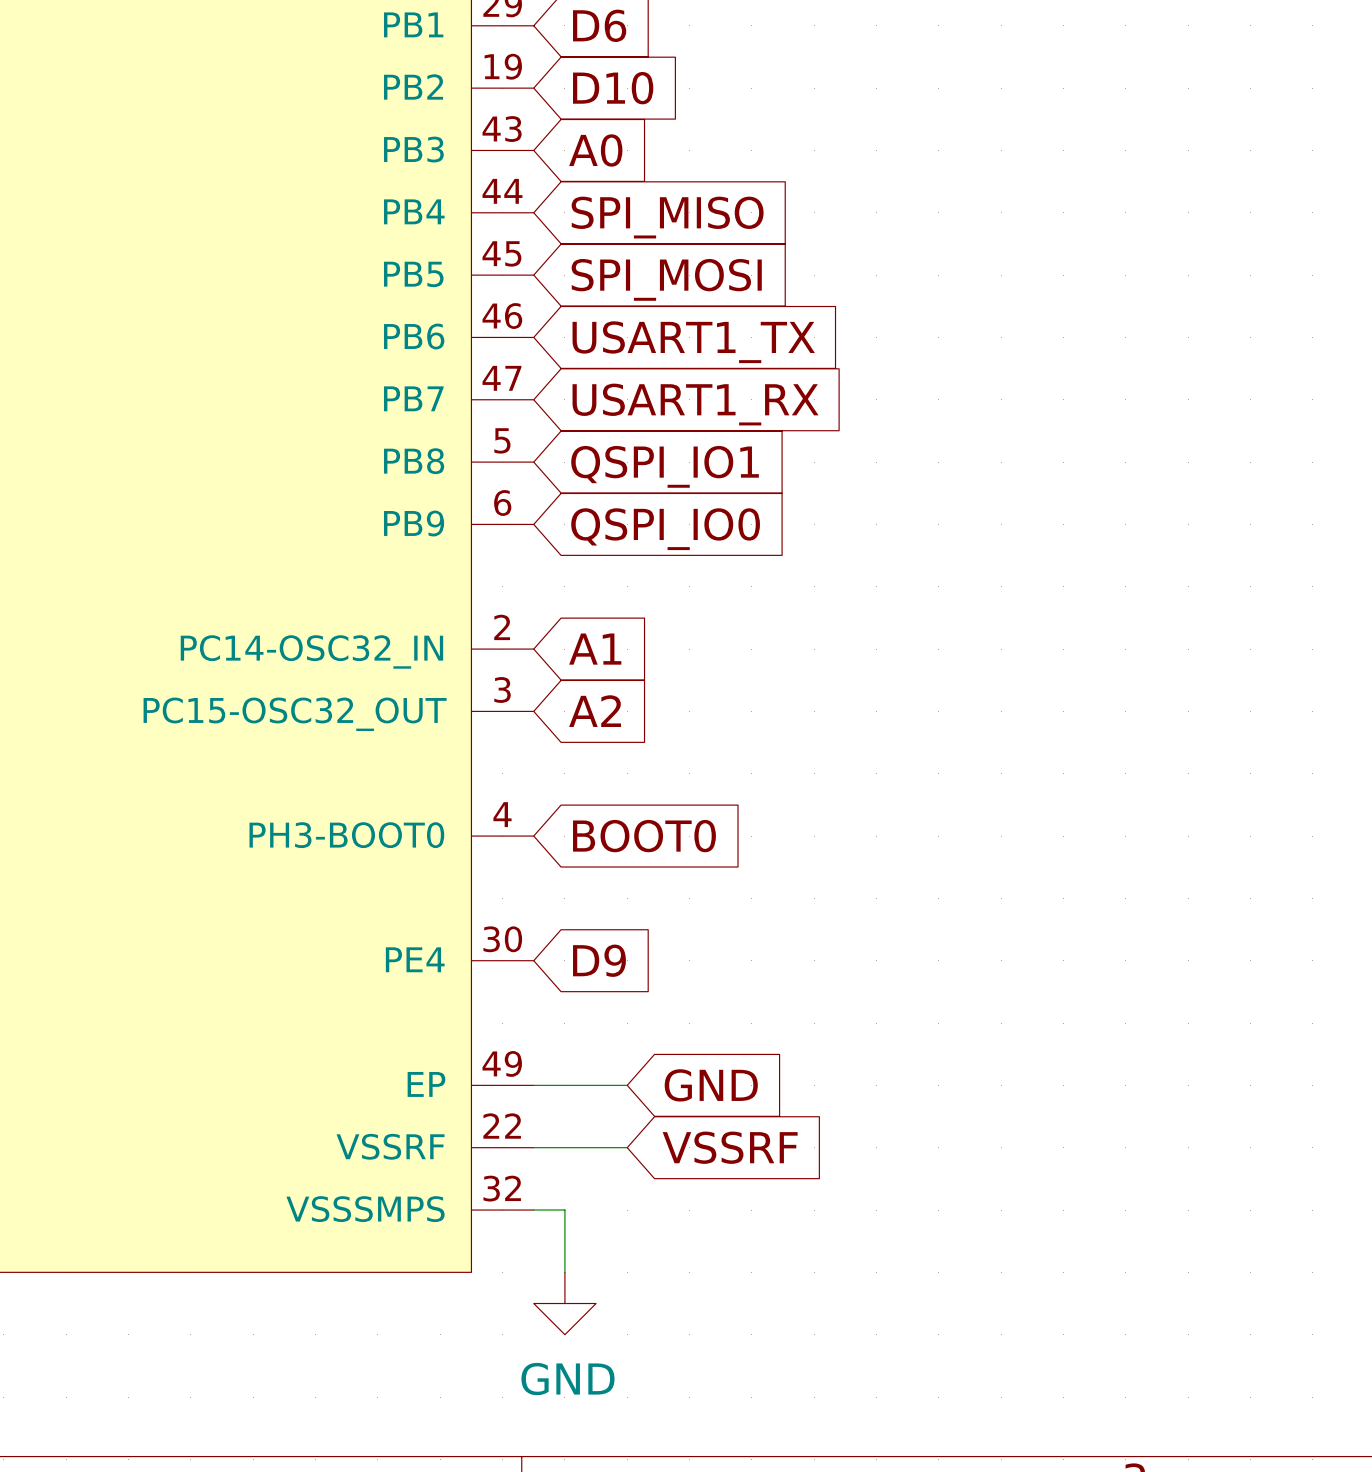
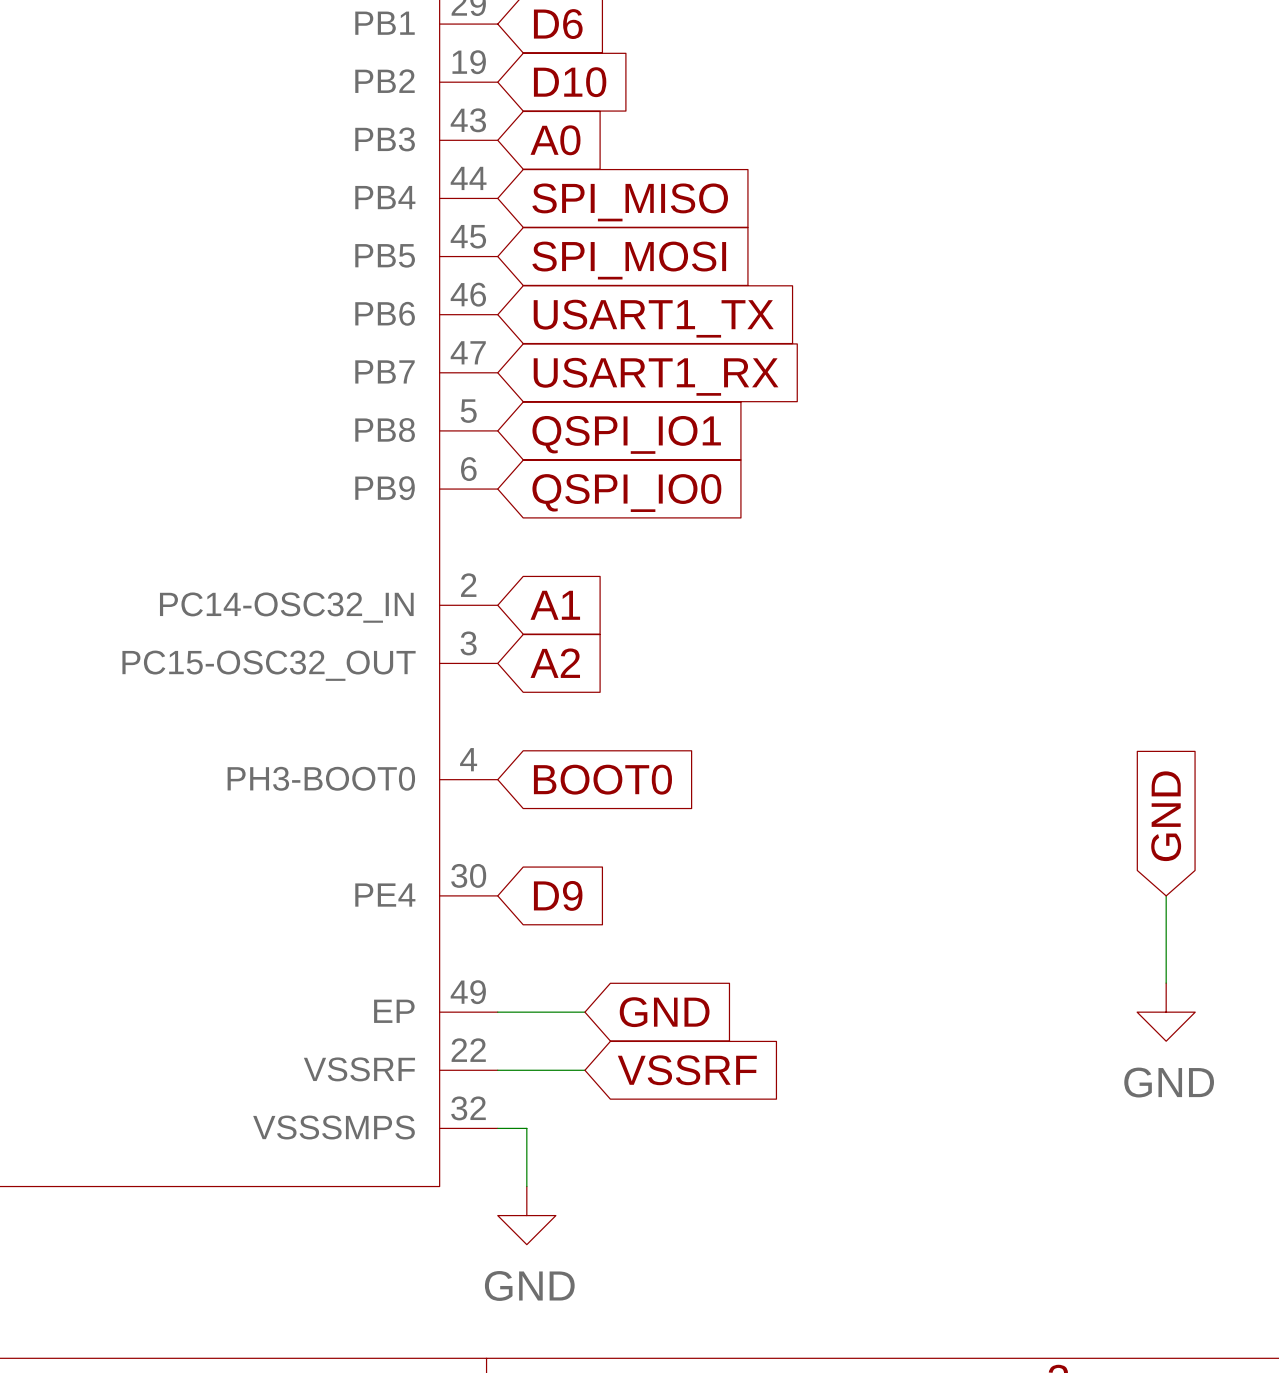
global label: none -> GND (1166, 816)
wire: none -> (1166, 895) (1166, 983)
power symbol: none -> GND (1166, 1012)

